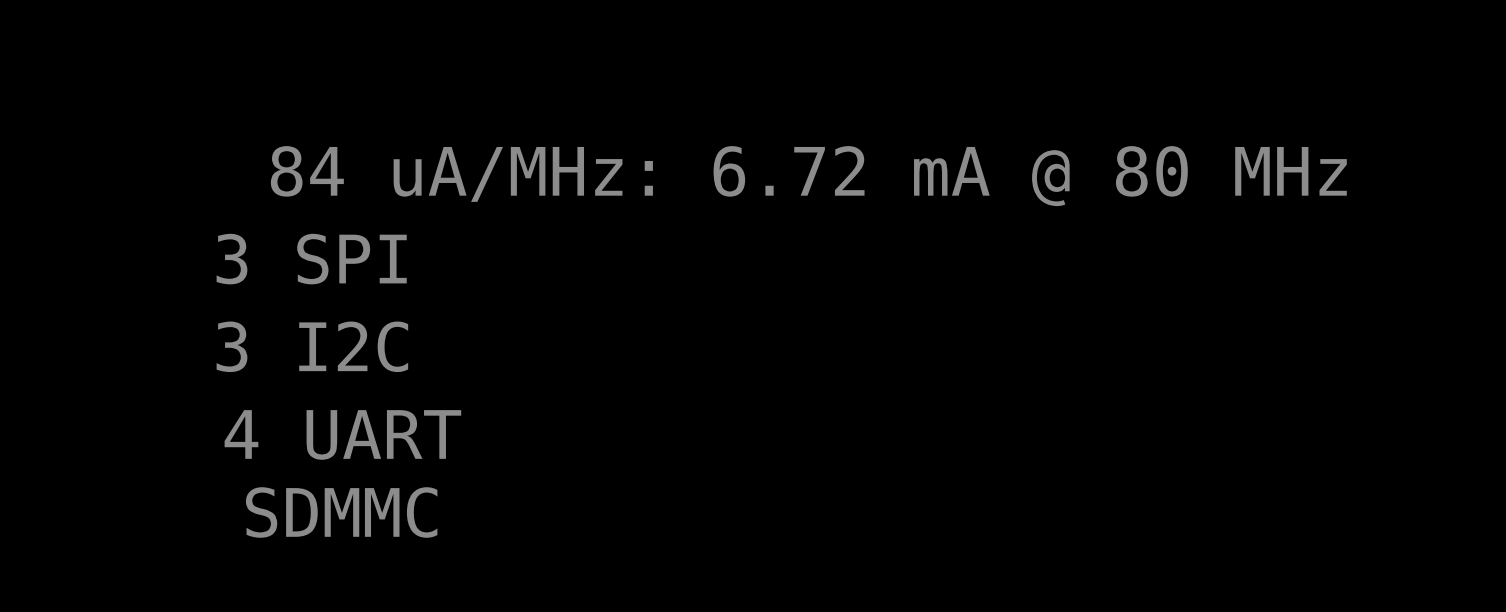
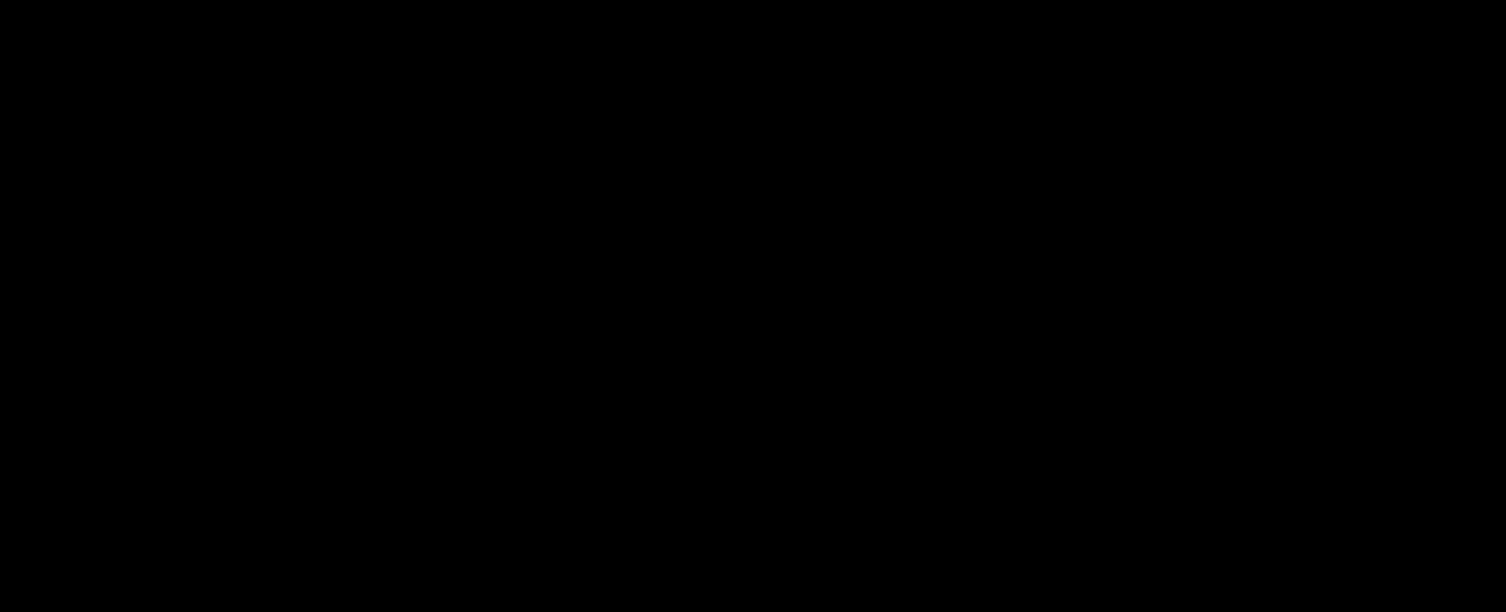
text: 84 uA/MHz: 6.72 mA @ 80 MHz (808, 176) -> none
text: 3 SPI (311, 259) -> none
text: 3 I2C (312, 346) -> none
text: 4 UART (342, 434) -> none
text: SDMMC (341, 512) -> none

